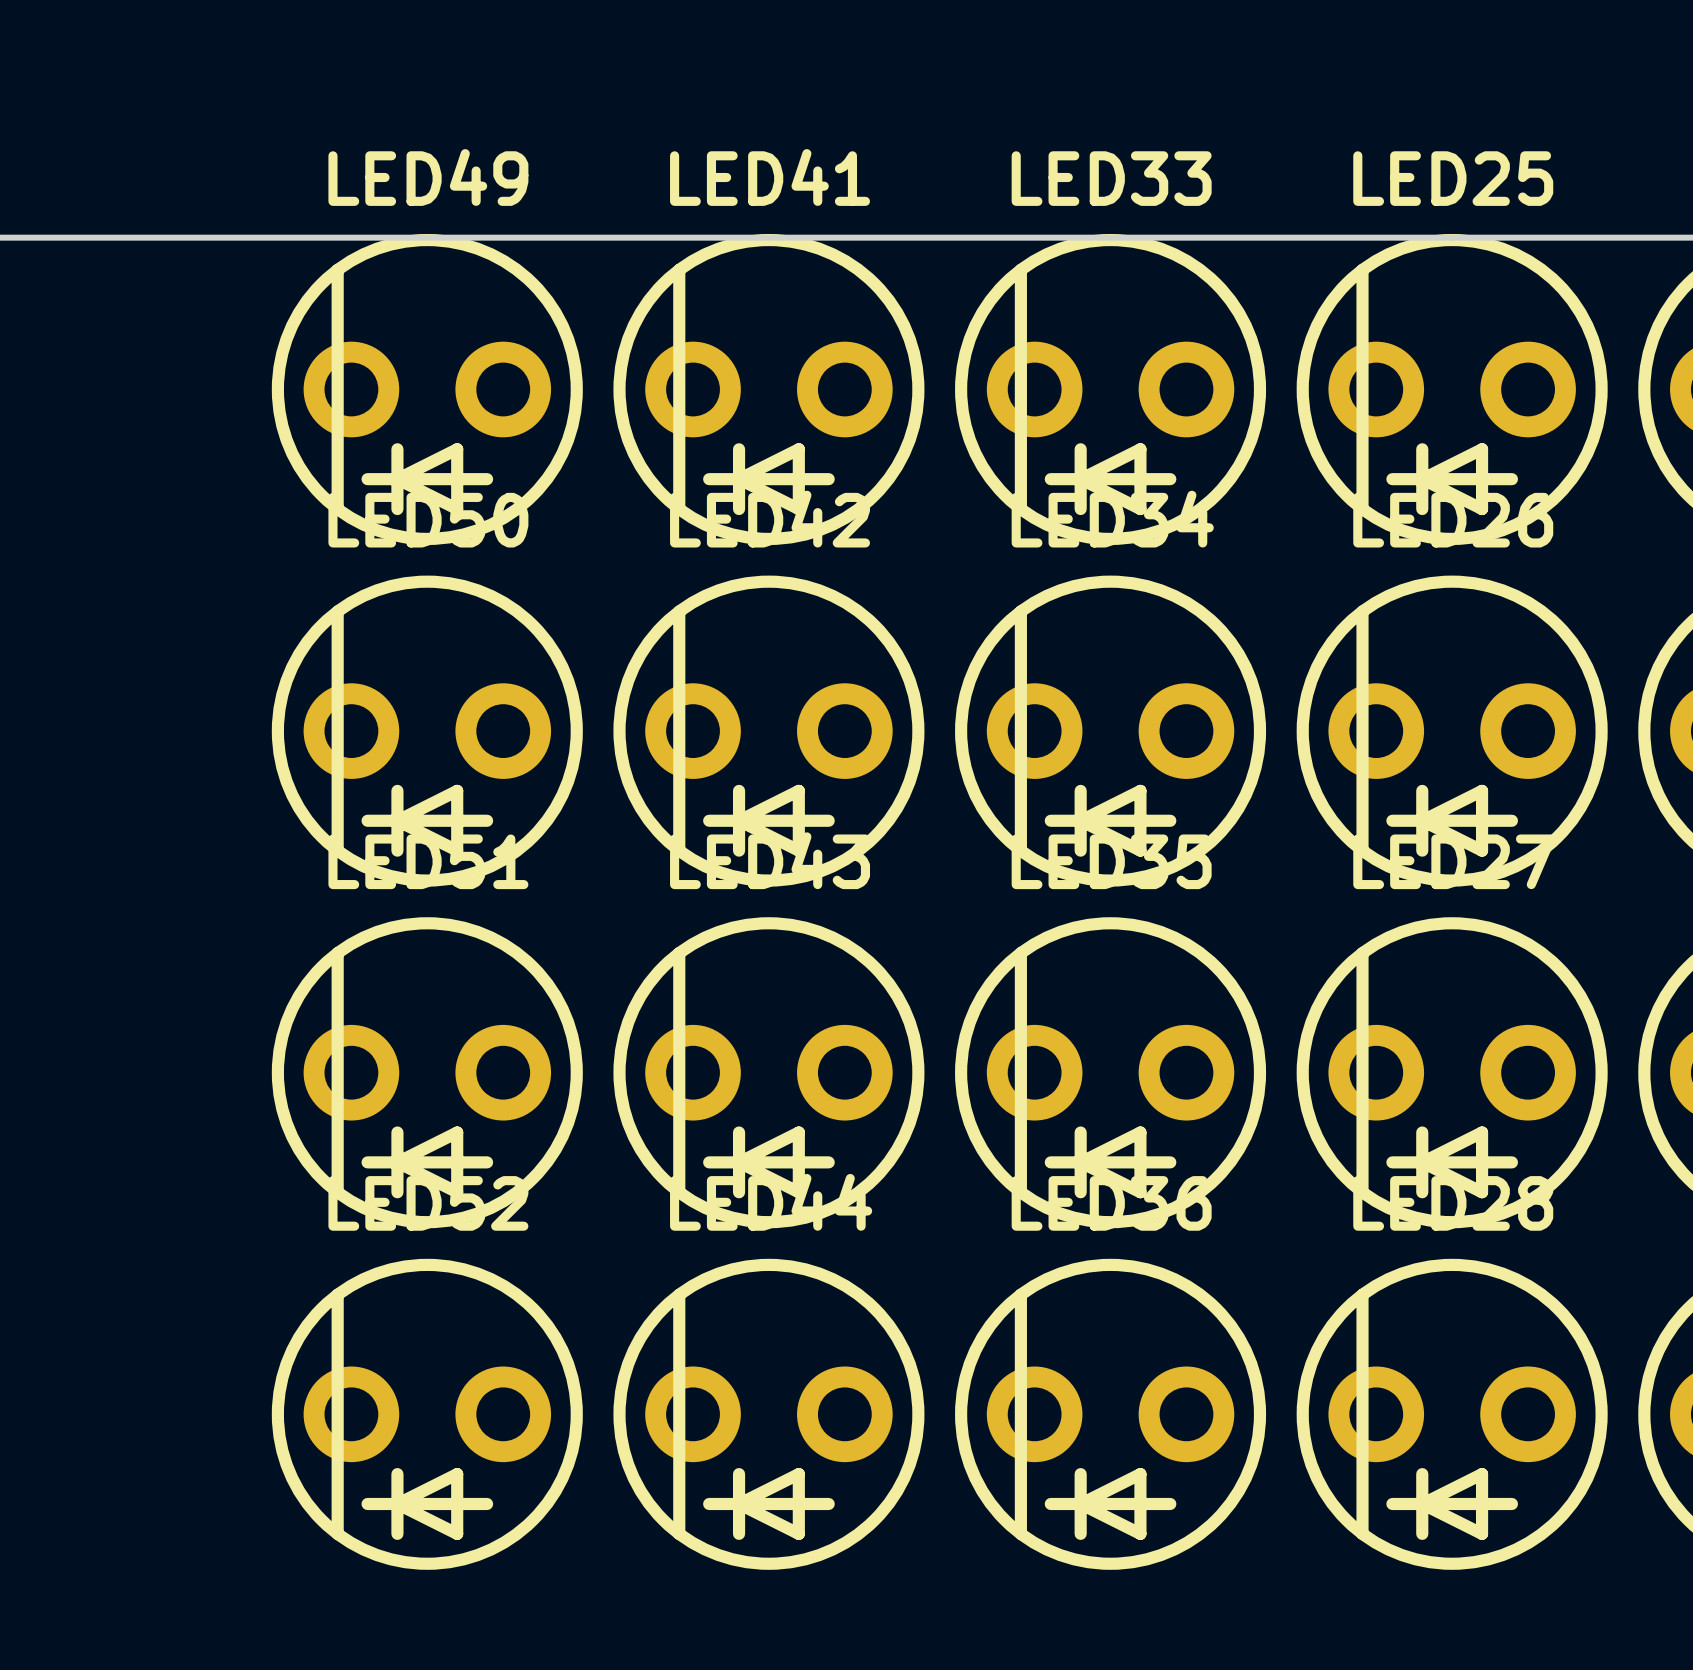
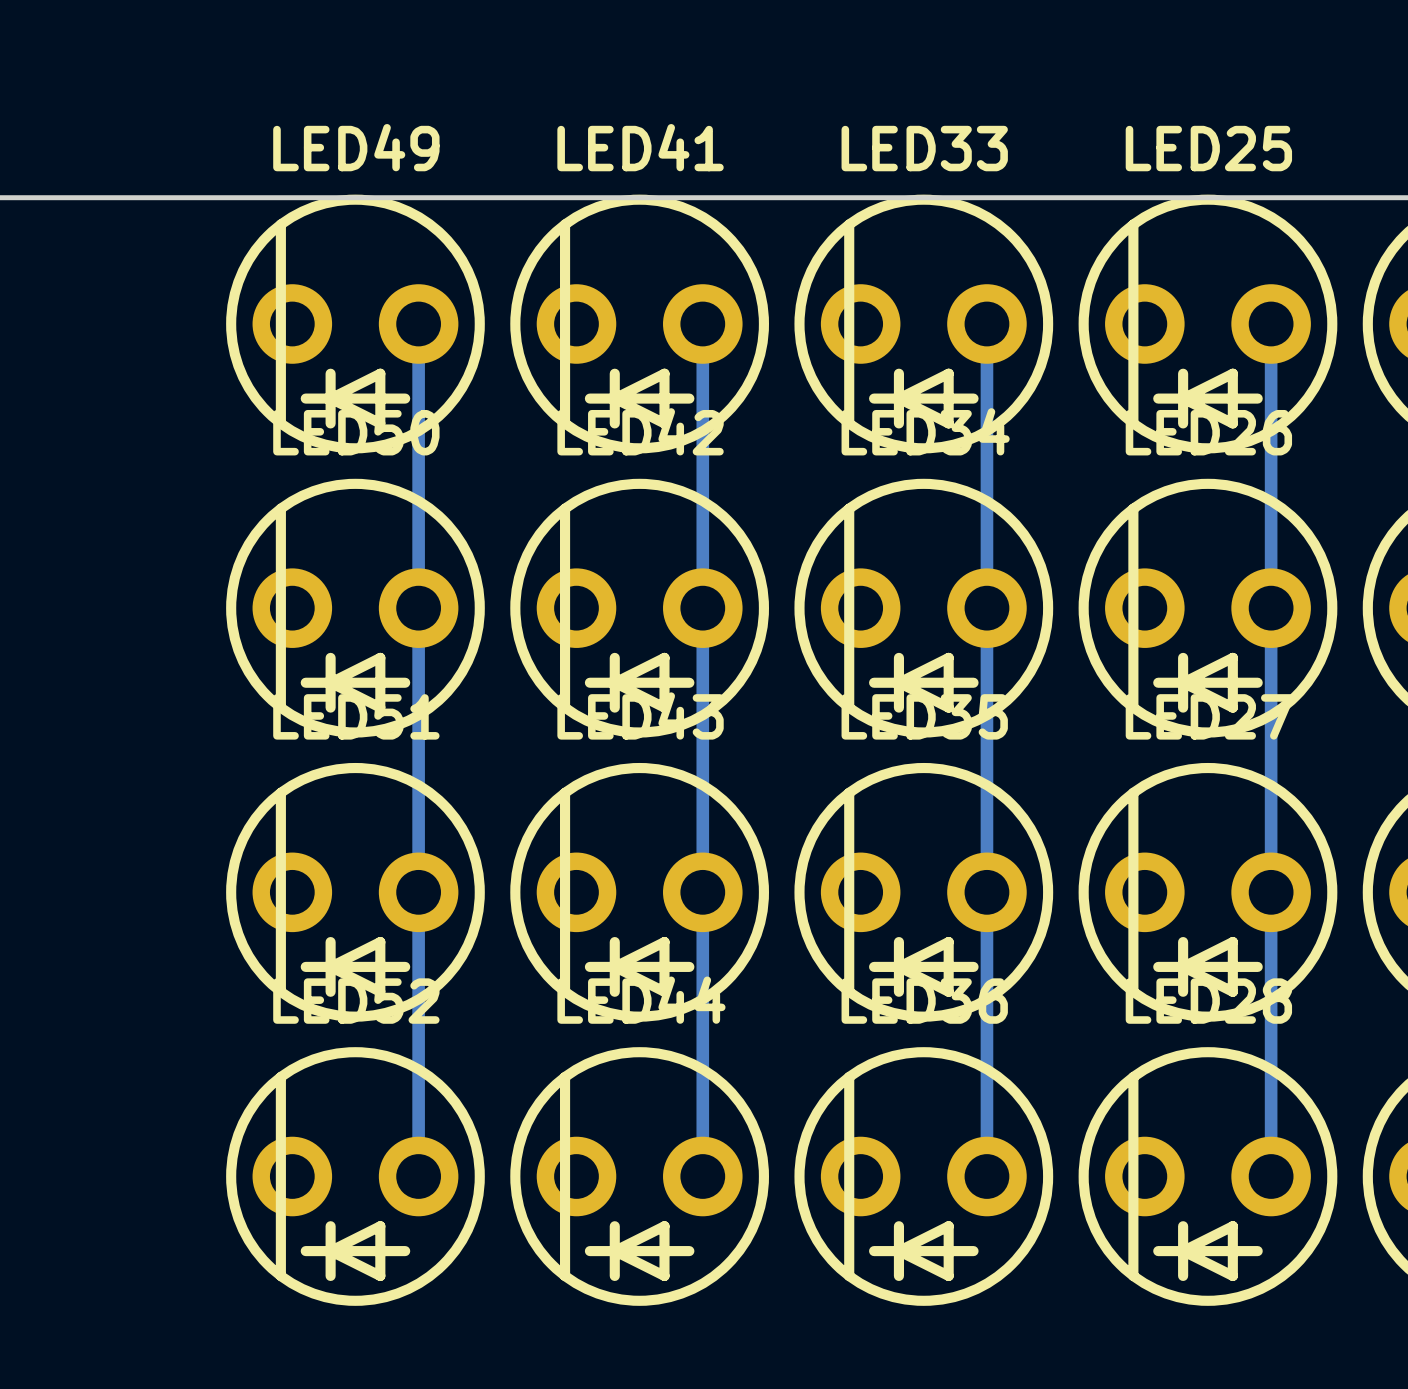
track: none -> (418, 323) (418, 1176)
track: none -> (702, 323) (702, 1176)
track: none -> (986, 323) (986, 1176)
track: none -> (1271, 323) (1271, 1176)

